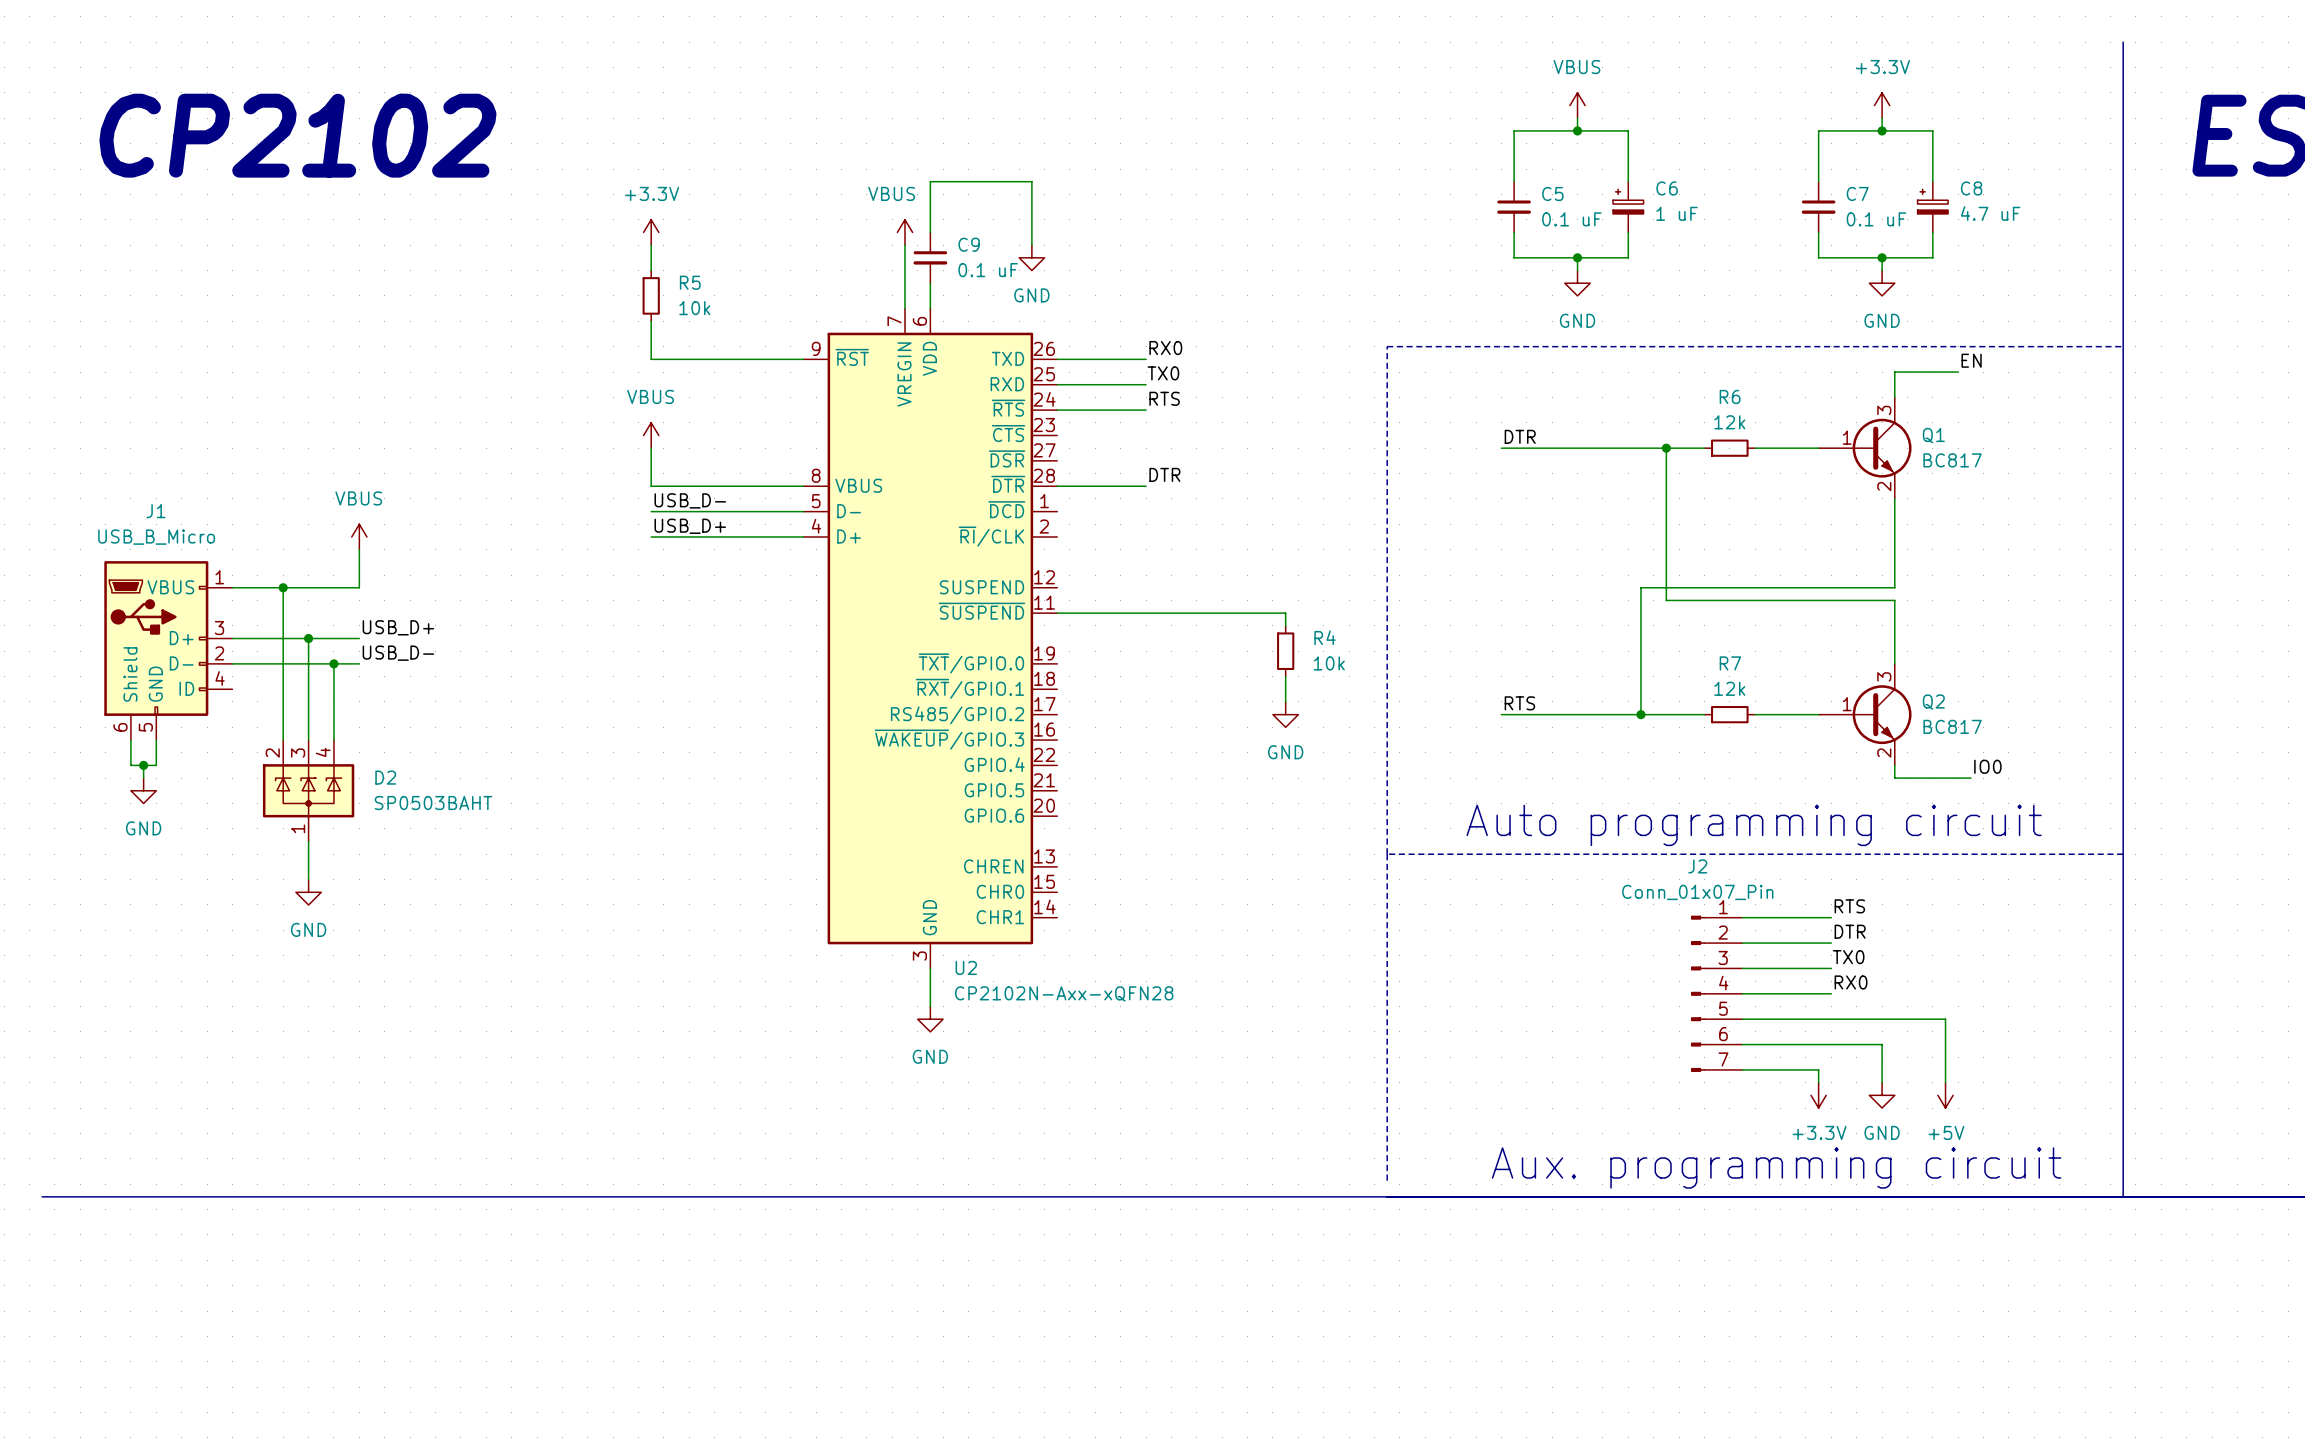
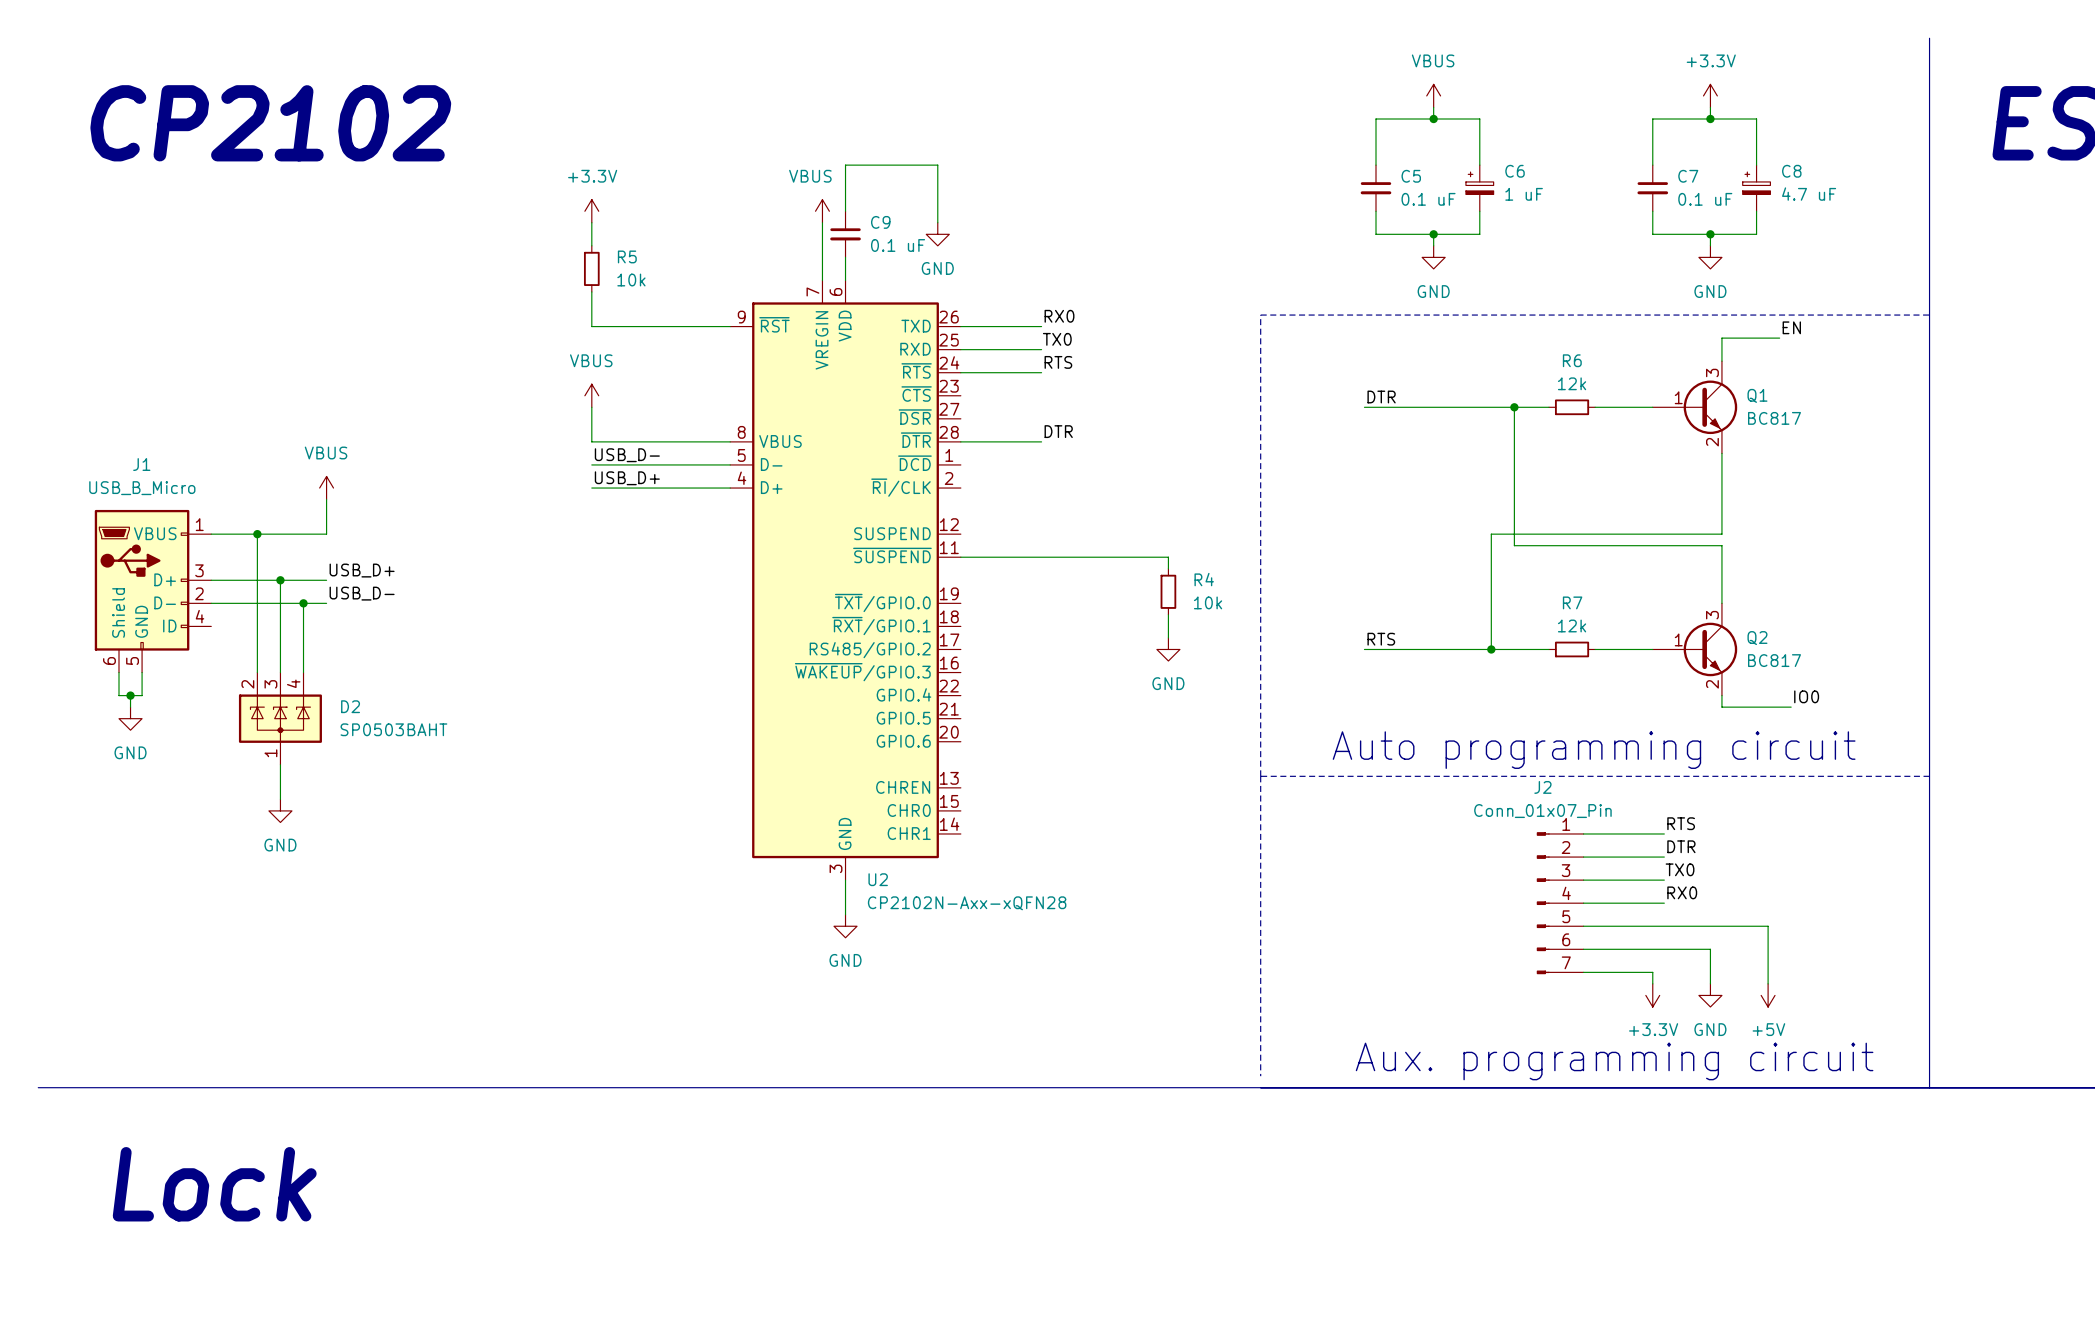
text: none -> Lock (214, 1184)

